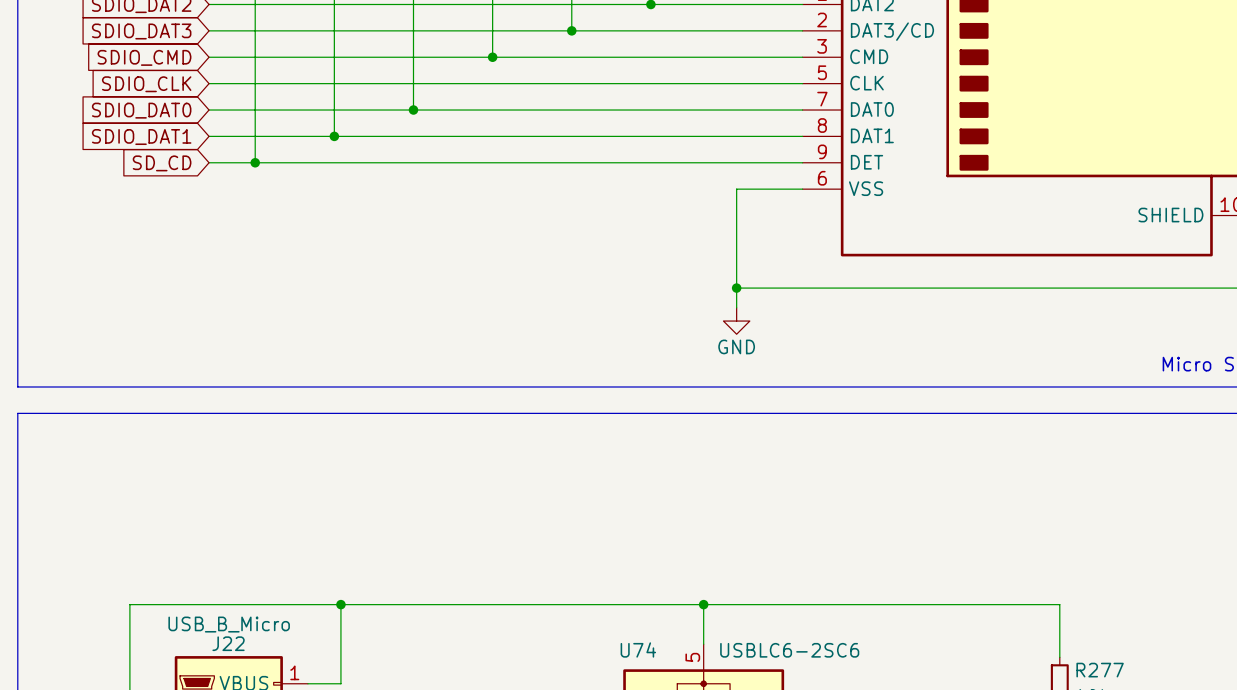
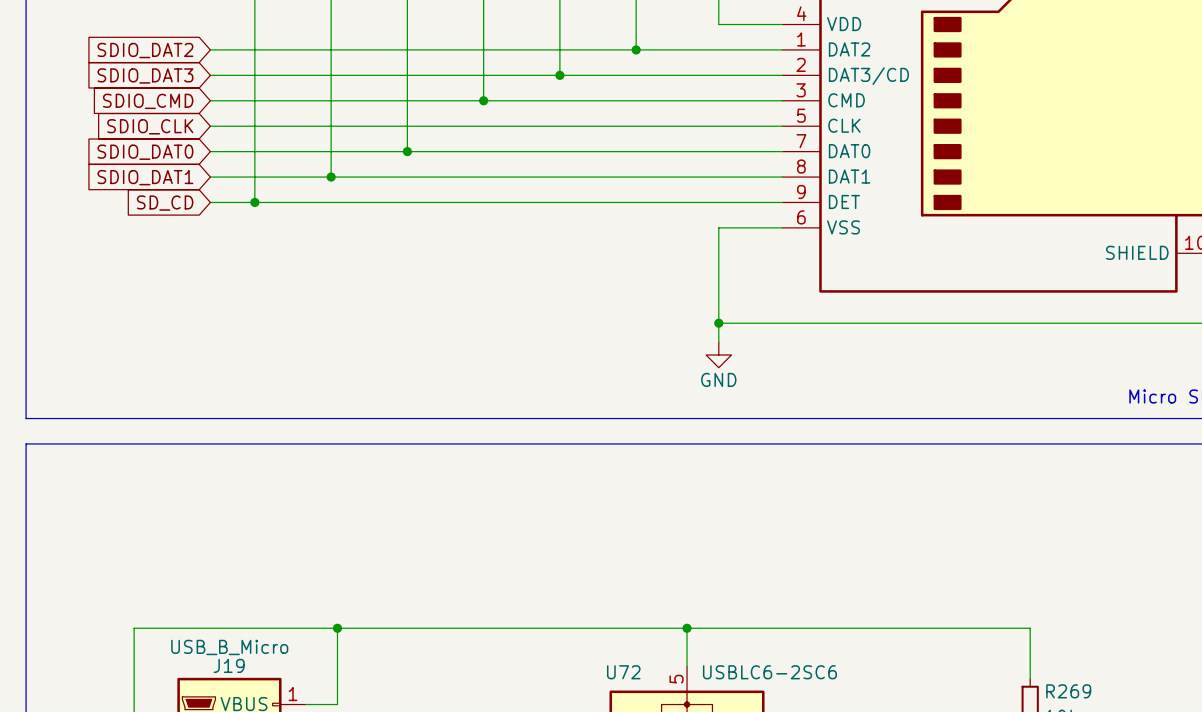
J22 name: J22 (228, 643) -> J19 (229, 665)
U74 name: U74 (638, 649) -> U72 (623, 672)
R277 name: R277 (1100, 670) -> R269 (1068, 691)

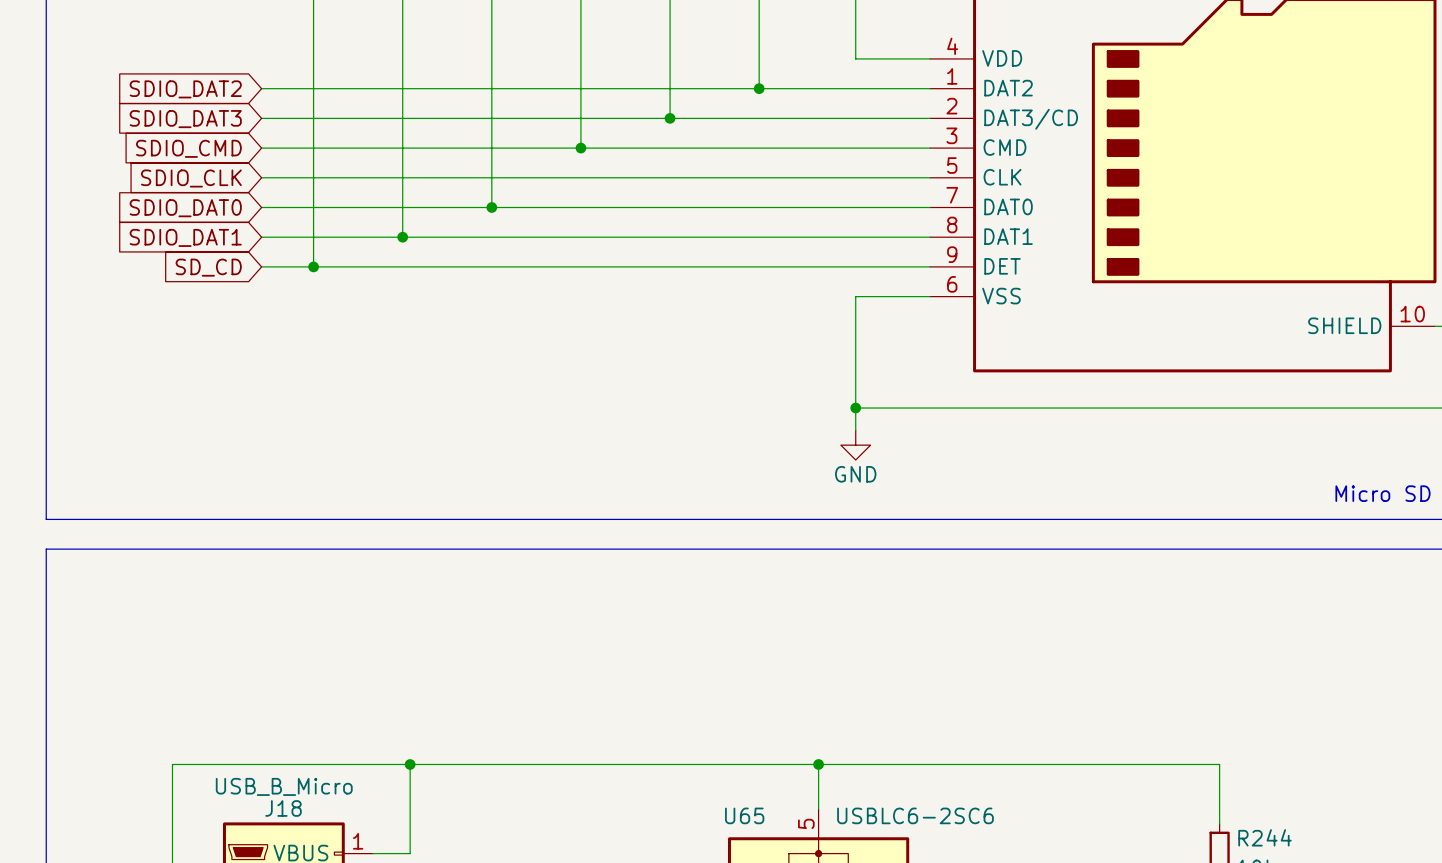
J19 name: J19 (229, 665) -> J18 (283, 808)
U72 name: U72 (623, 672) -> U65 (744, 815)
R269 name: R269 (1068, 691) -> R244 (1265, 837)

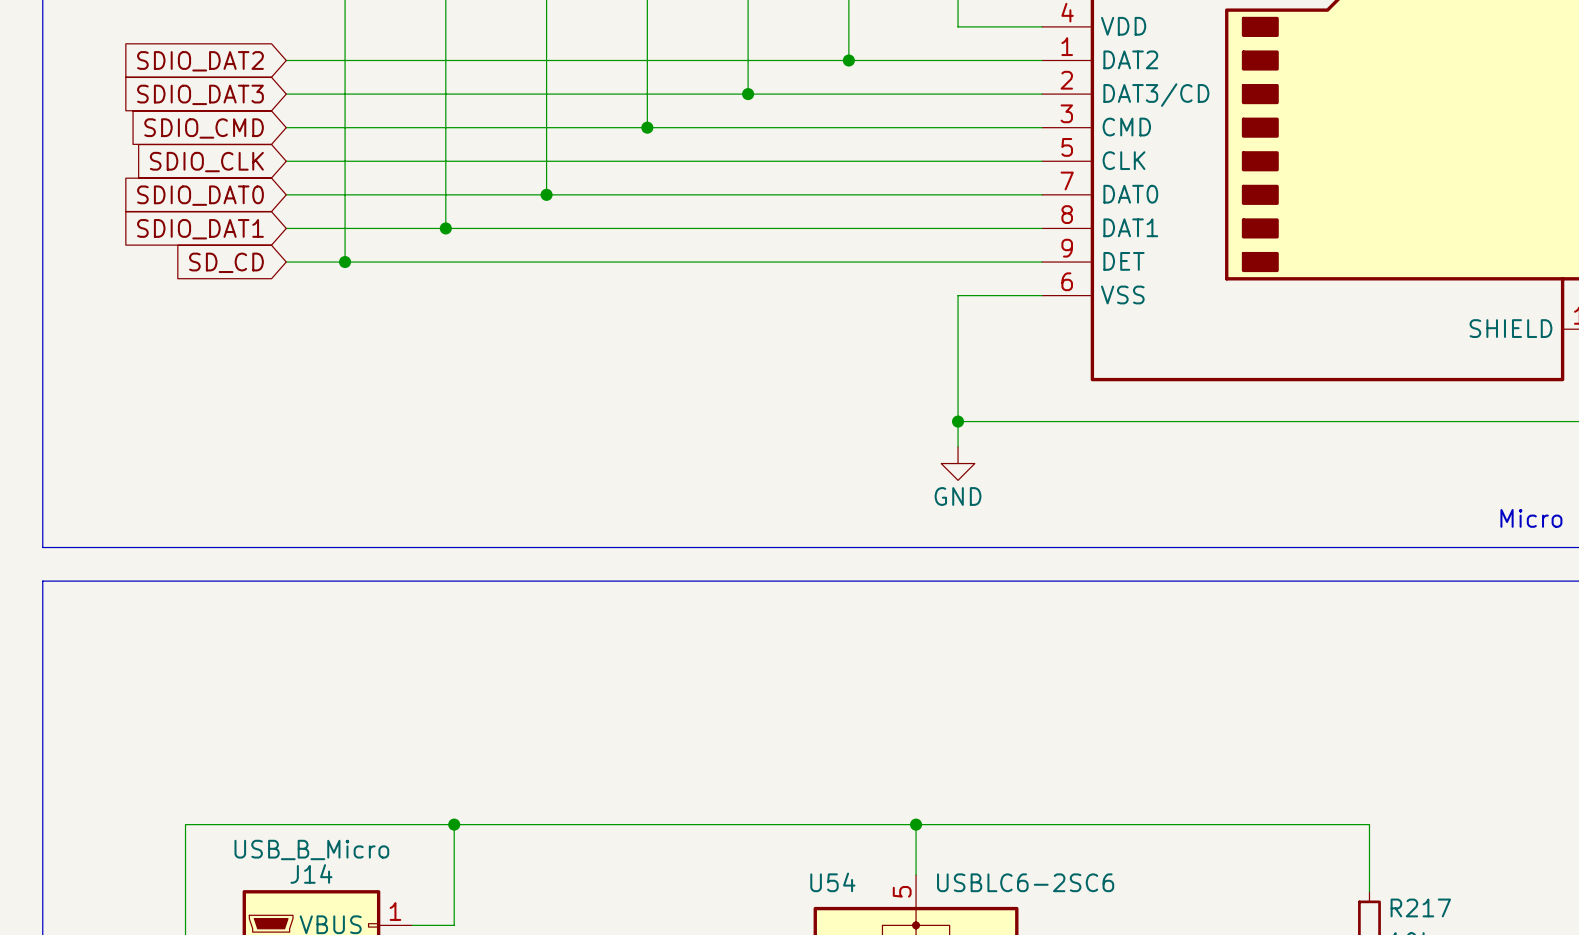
J18 name: J18 (283, 808) -> J14 (311, 873)
U65 name: U65 (744, 815) -> U54 (832, 882)
R244 name: R244 (1265, 837) -> R217 (1420, 907)

